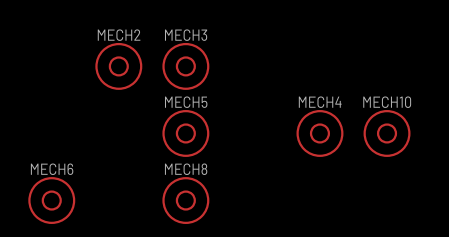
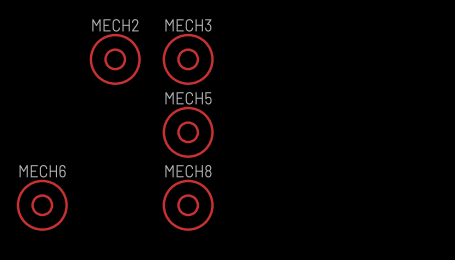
MECH4: (319, 133) -> none
MECH10: (387, 133) -> none

